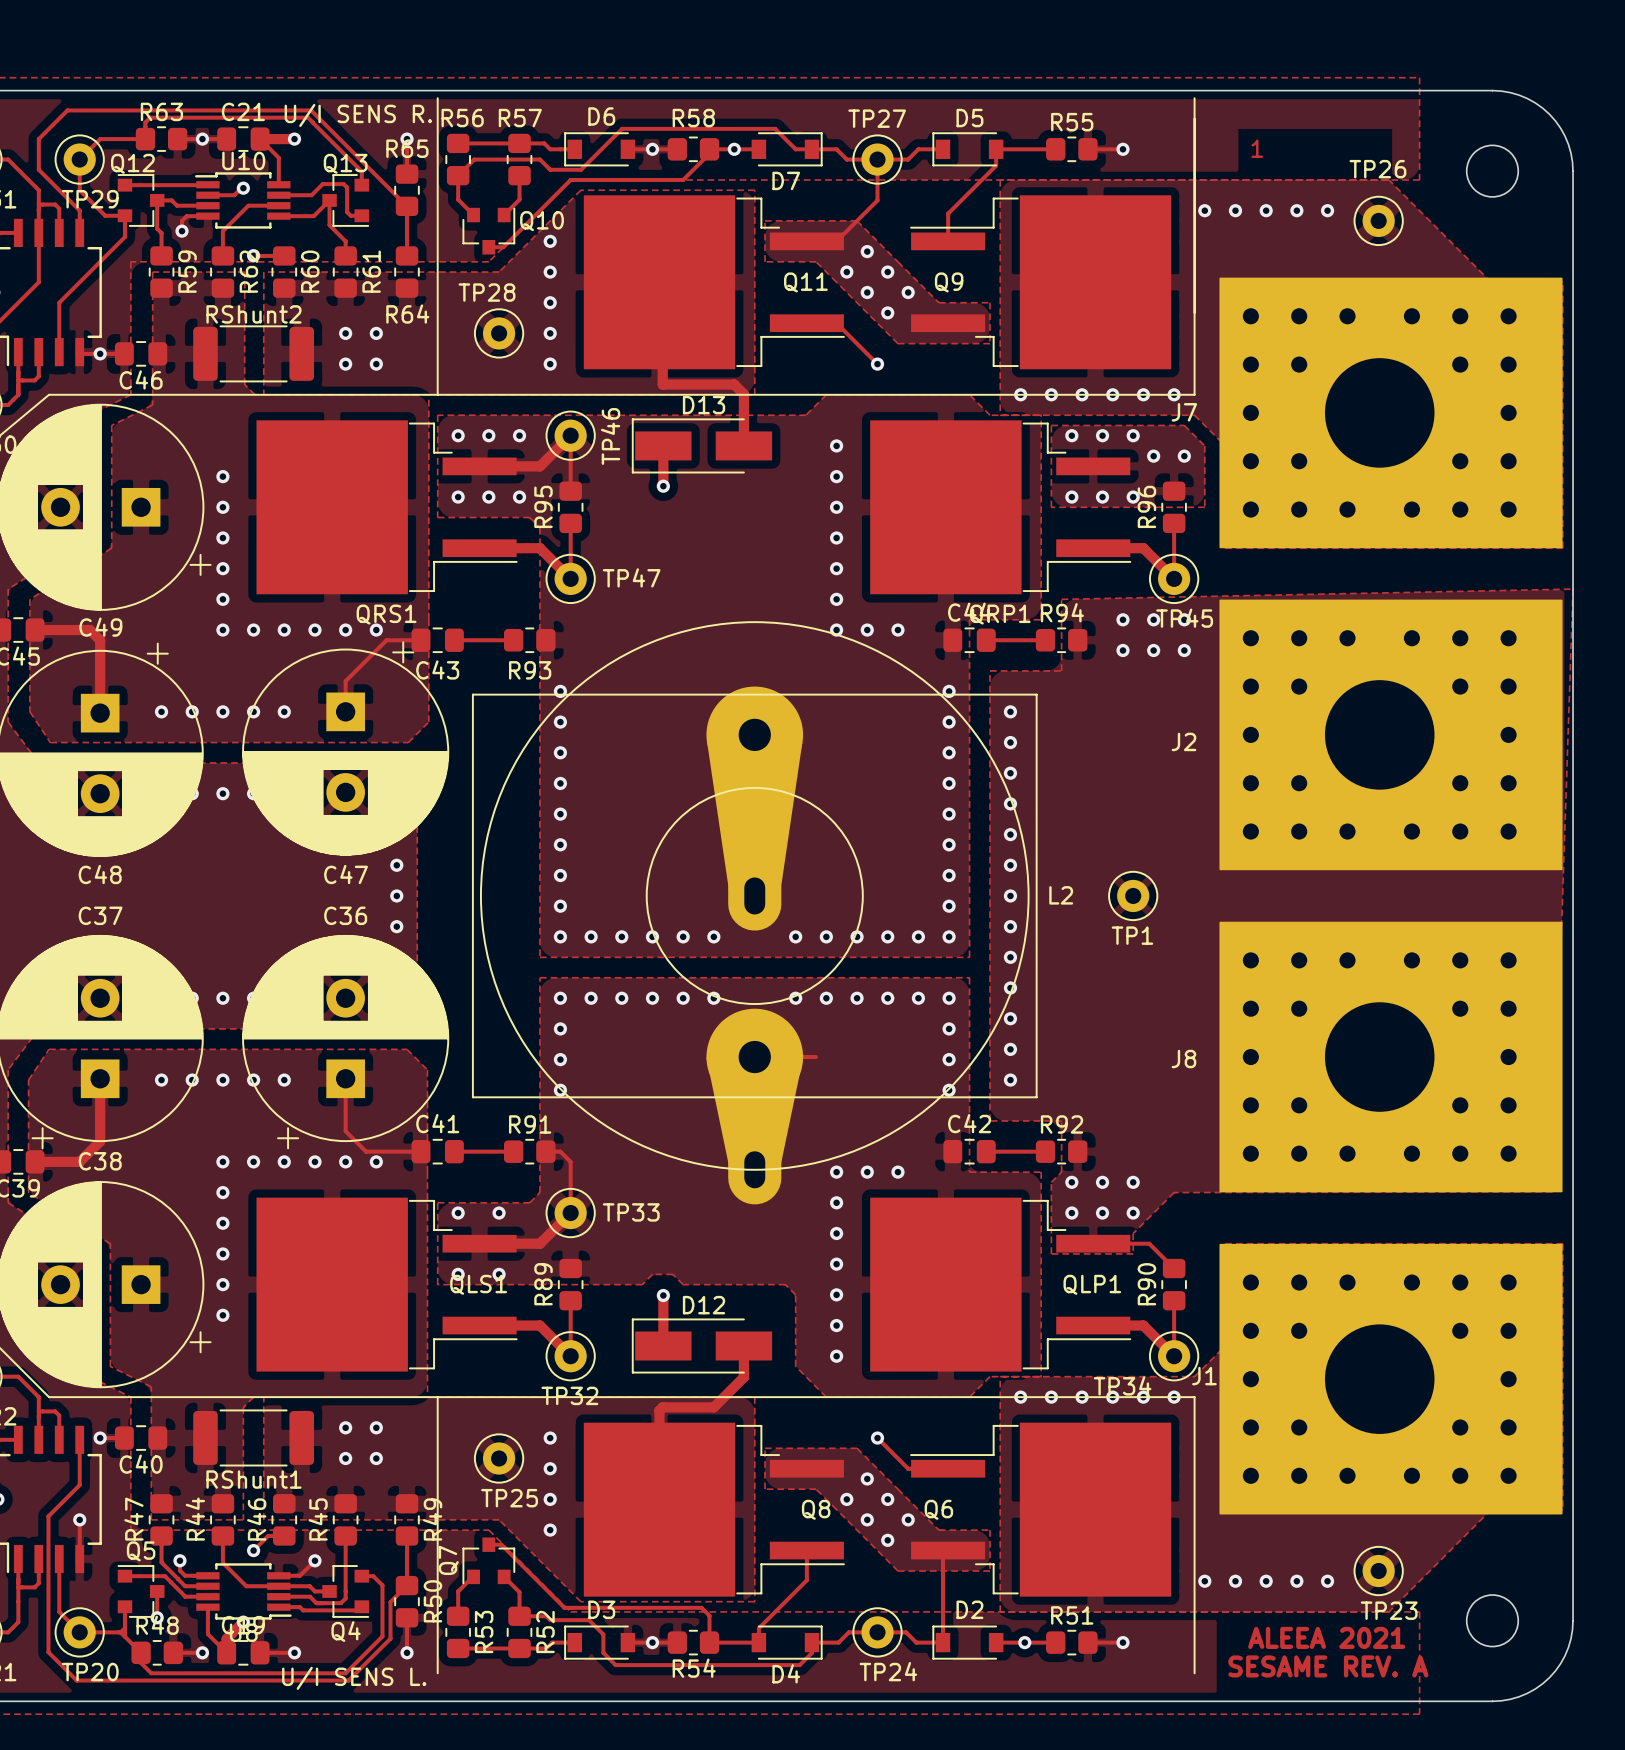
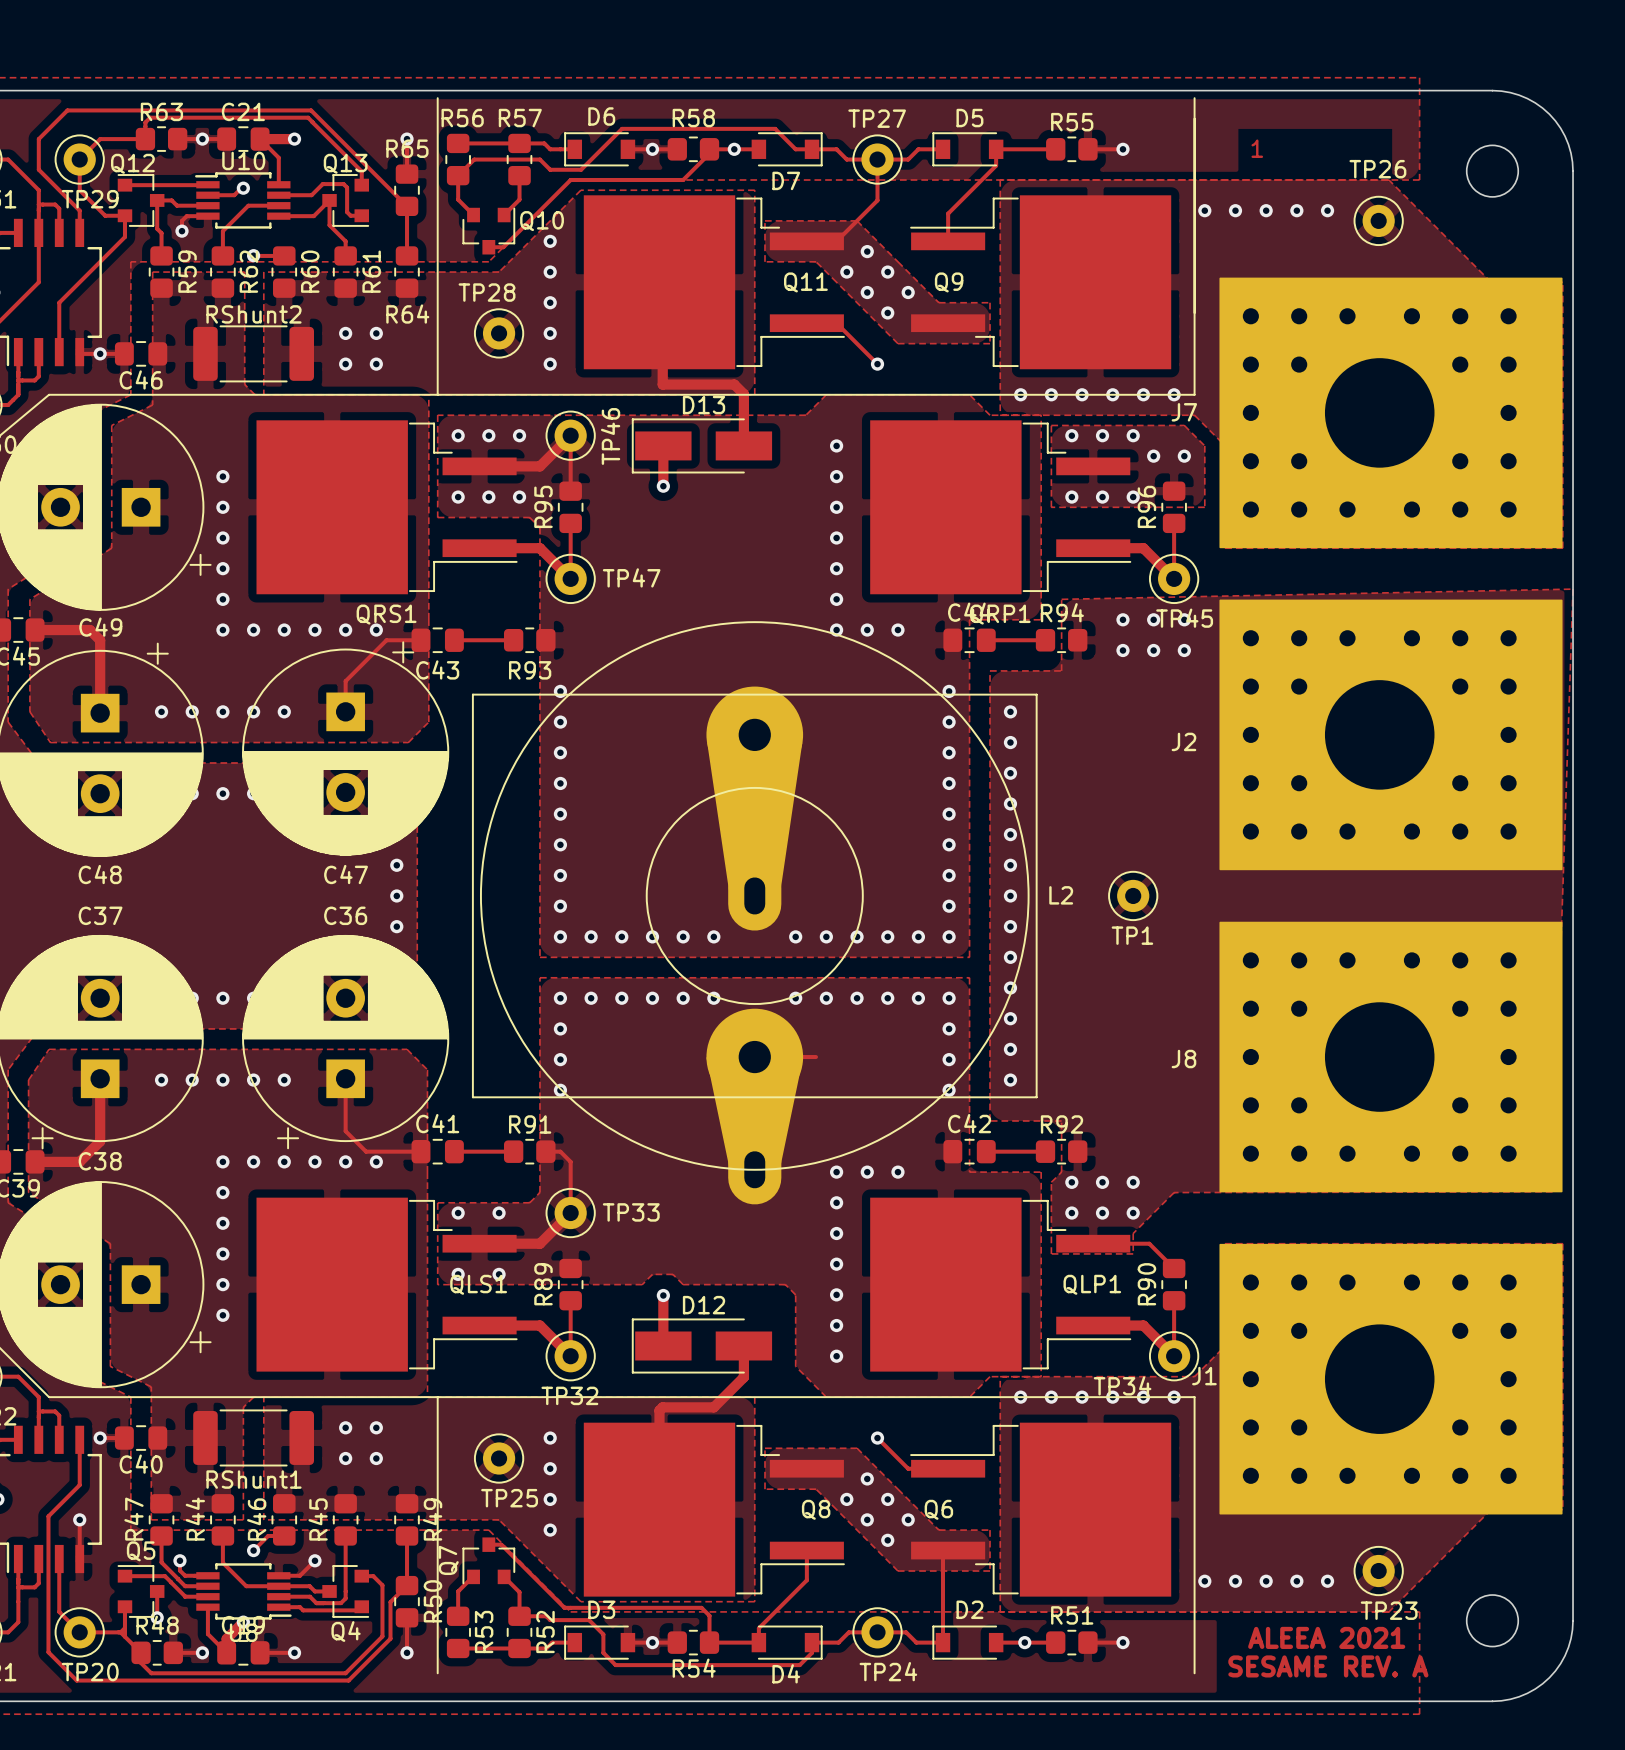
text: U/I SENS R. (358, 115) -> none
text: U/I SENS L. (354, 1678) -> none

